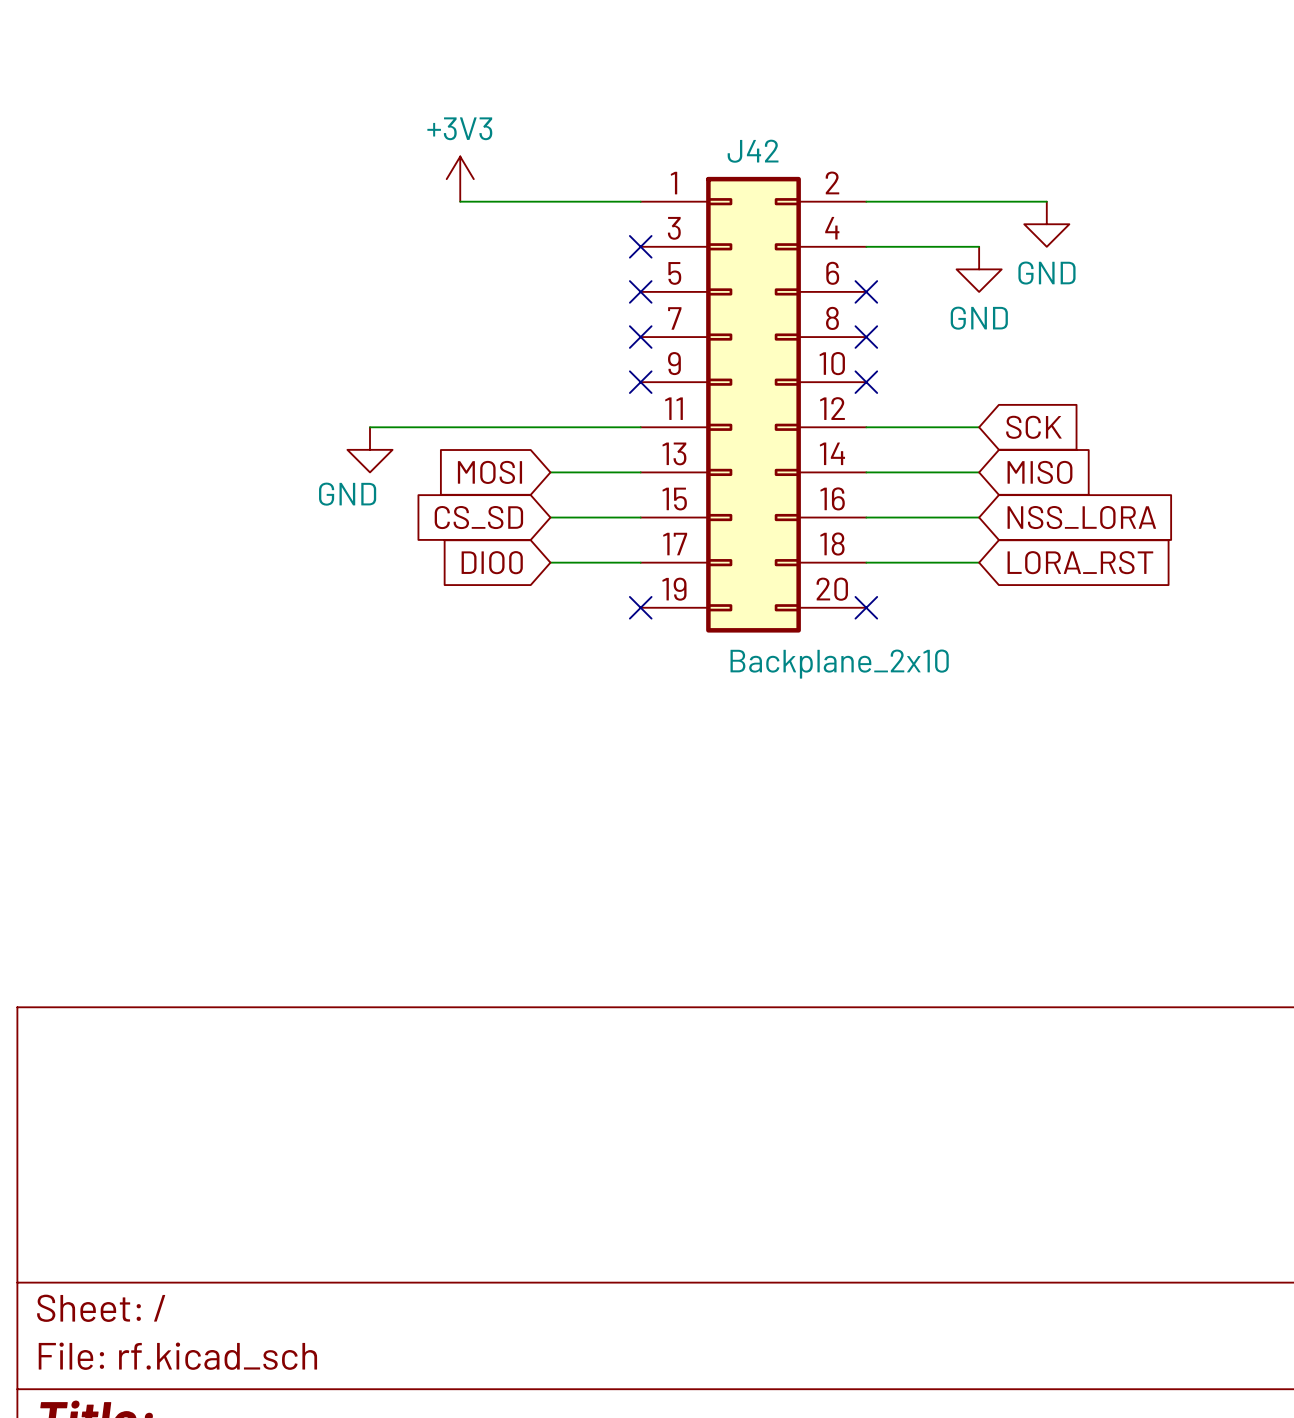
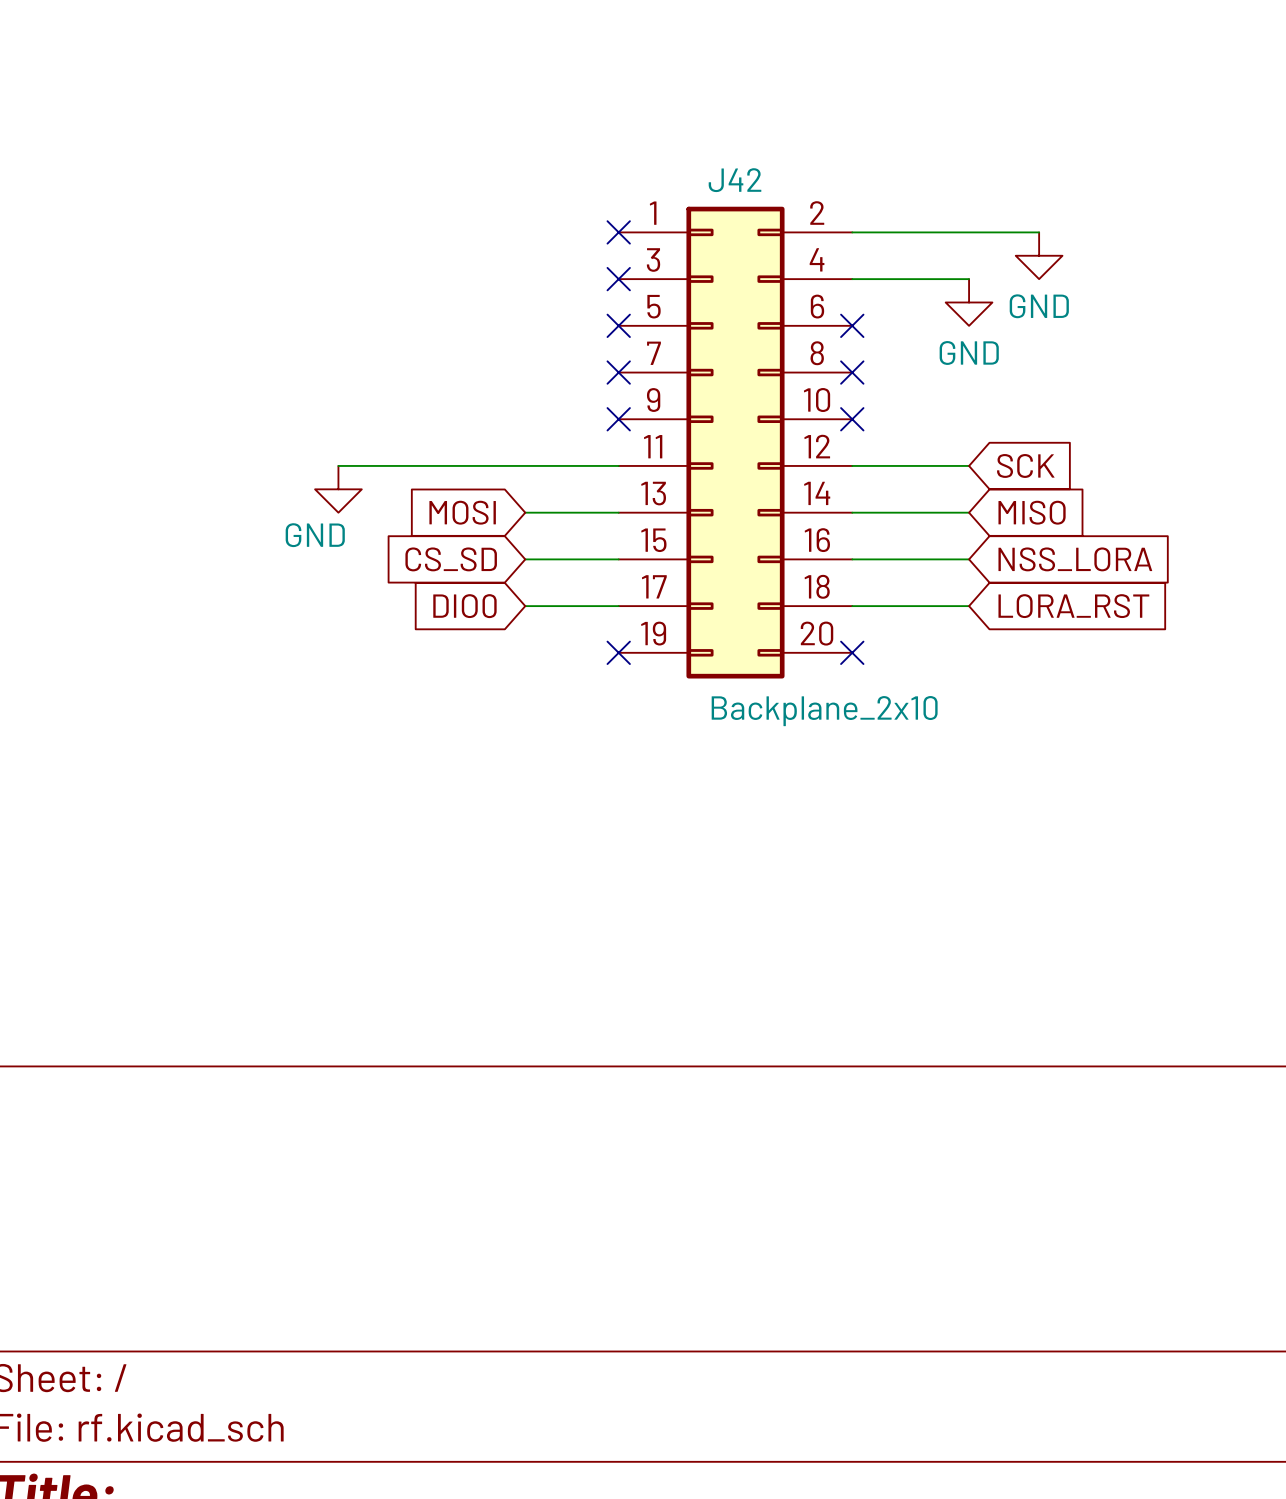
power symbol: +3V3 (460, 179) -> none
wire: (460, 201) (640, 201) -> none
no-connect mark: none -> (618, 232)

